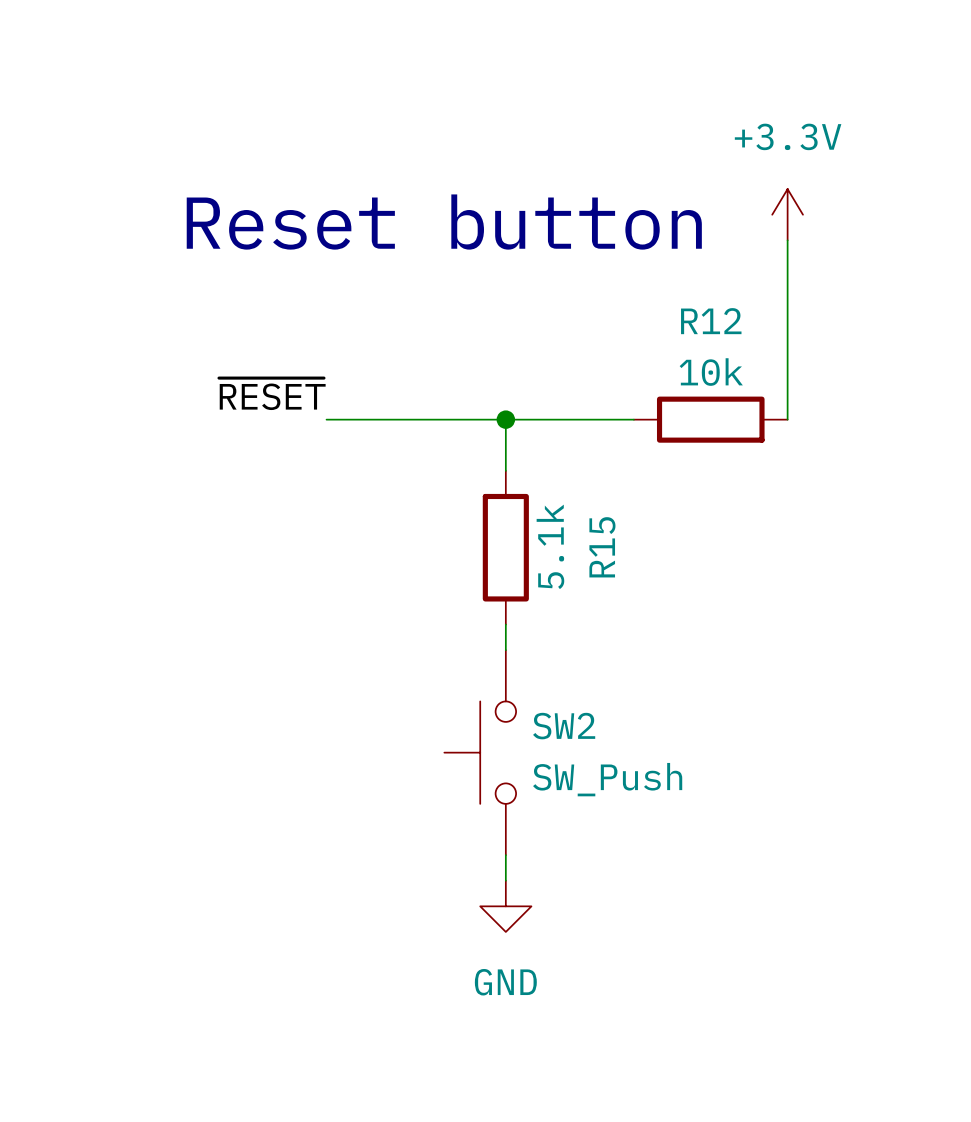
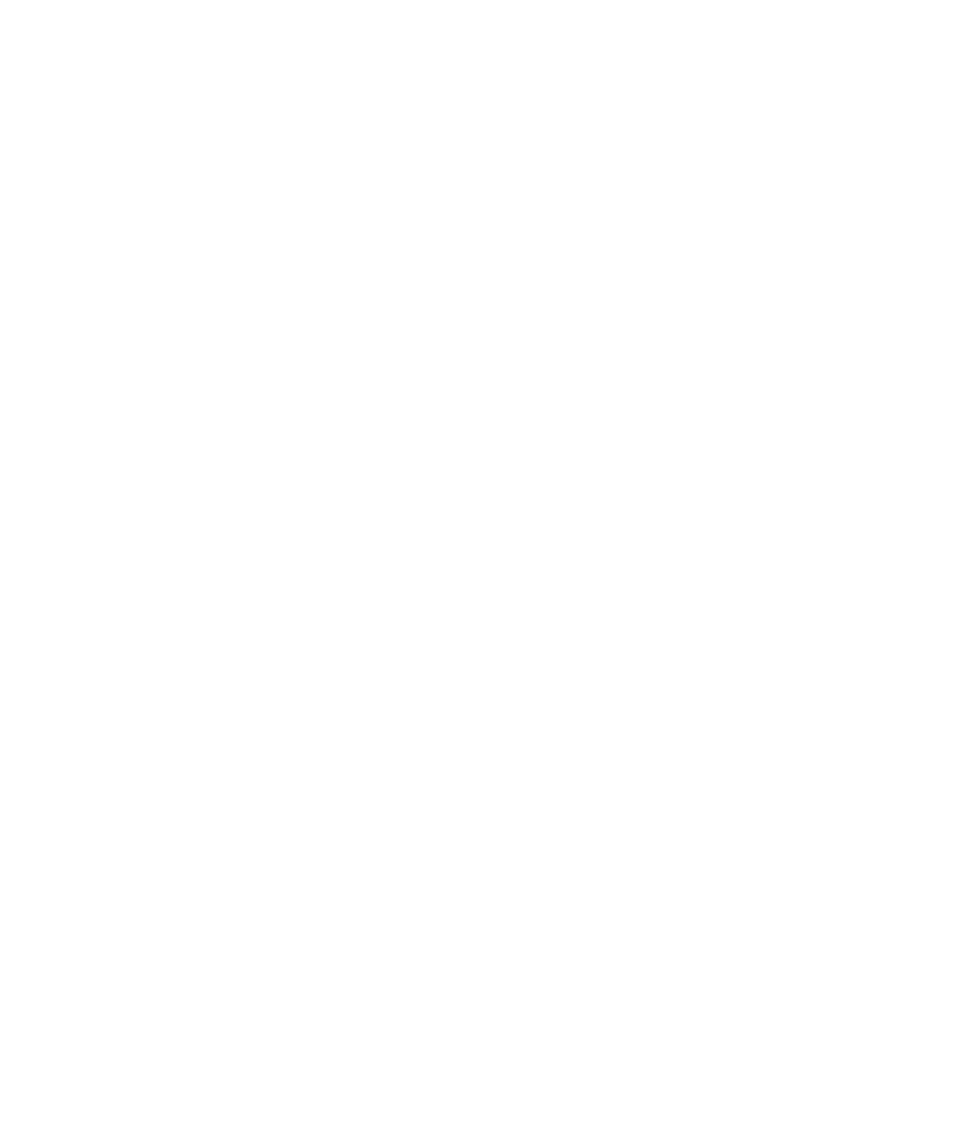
power symbol: +3.3V (787, 214) -> none
text: Reset button (444, 222) -> none
wire: (787, 240) (787, 419) -> none
label: ~{RESET} (272, 394) -> none
wire: (326, 419) (633, 419) -> none
wire: (505, 419) (505, 470) -> none
junction: (505, 419) -> none
R12: 10k (710, 419) -> none
R15: 5.1k (505, 547) -> none
wire: (505, 624) (505, 650) -> none
SW2: SW_Push (480, 752) -> none
wire: (505, 855) (505, 880) -> none
power symbol: GND (505, 906) -> none

